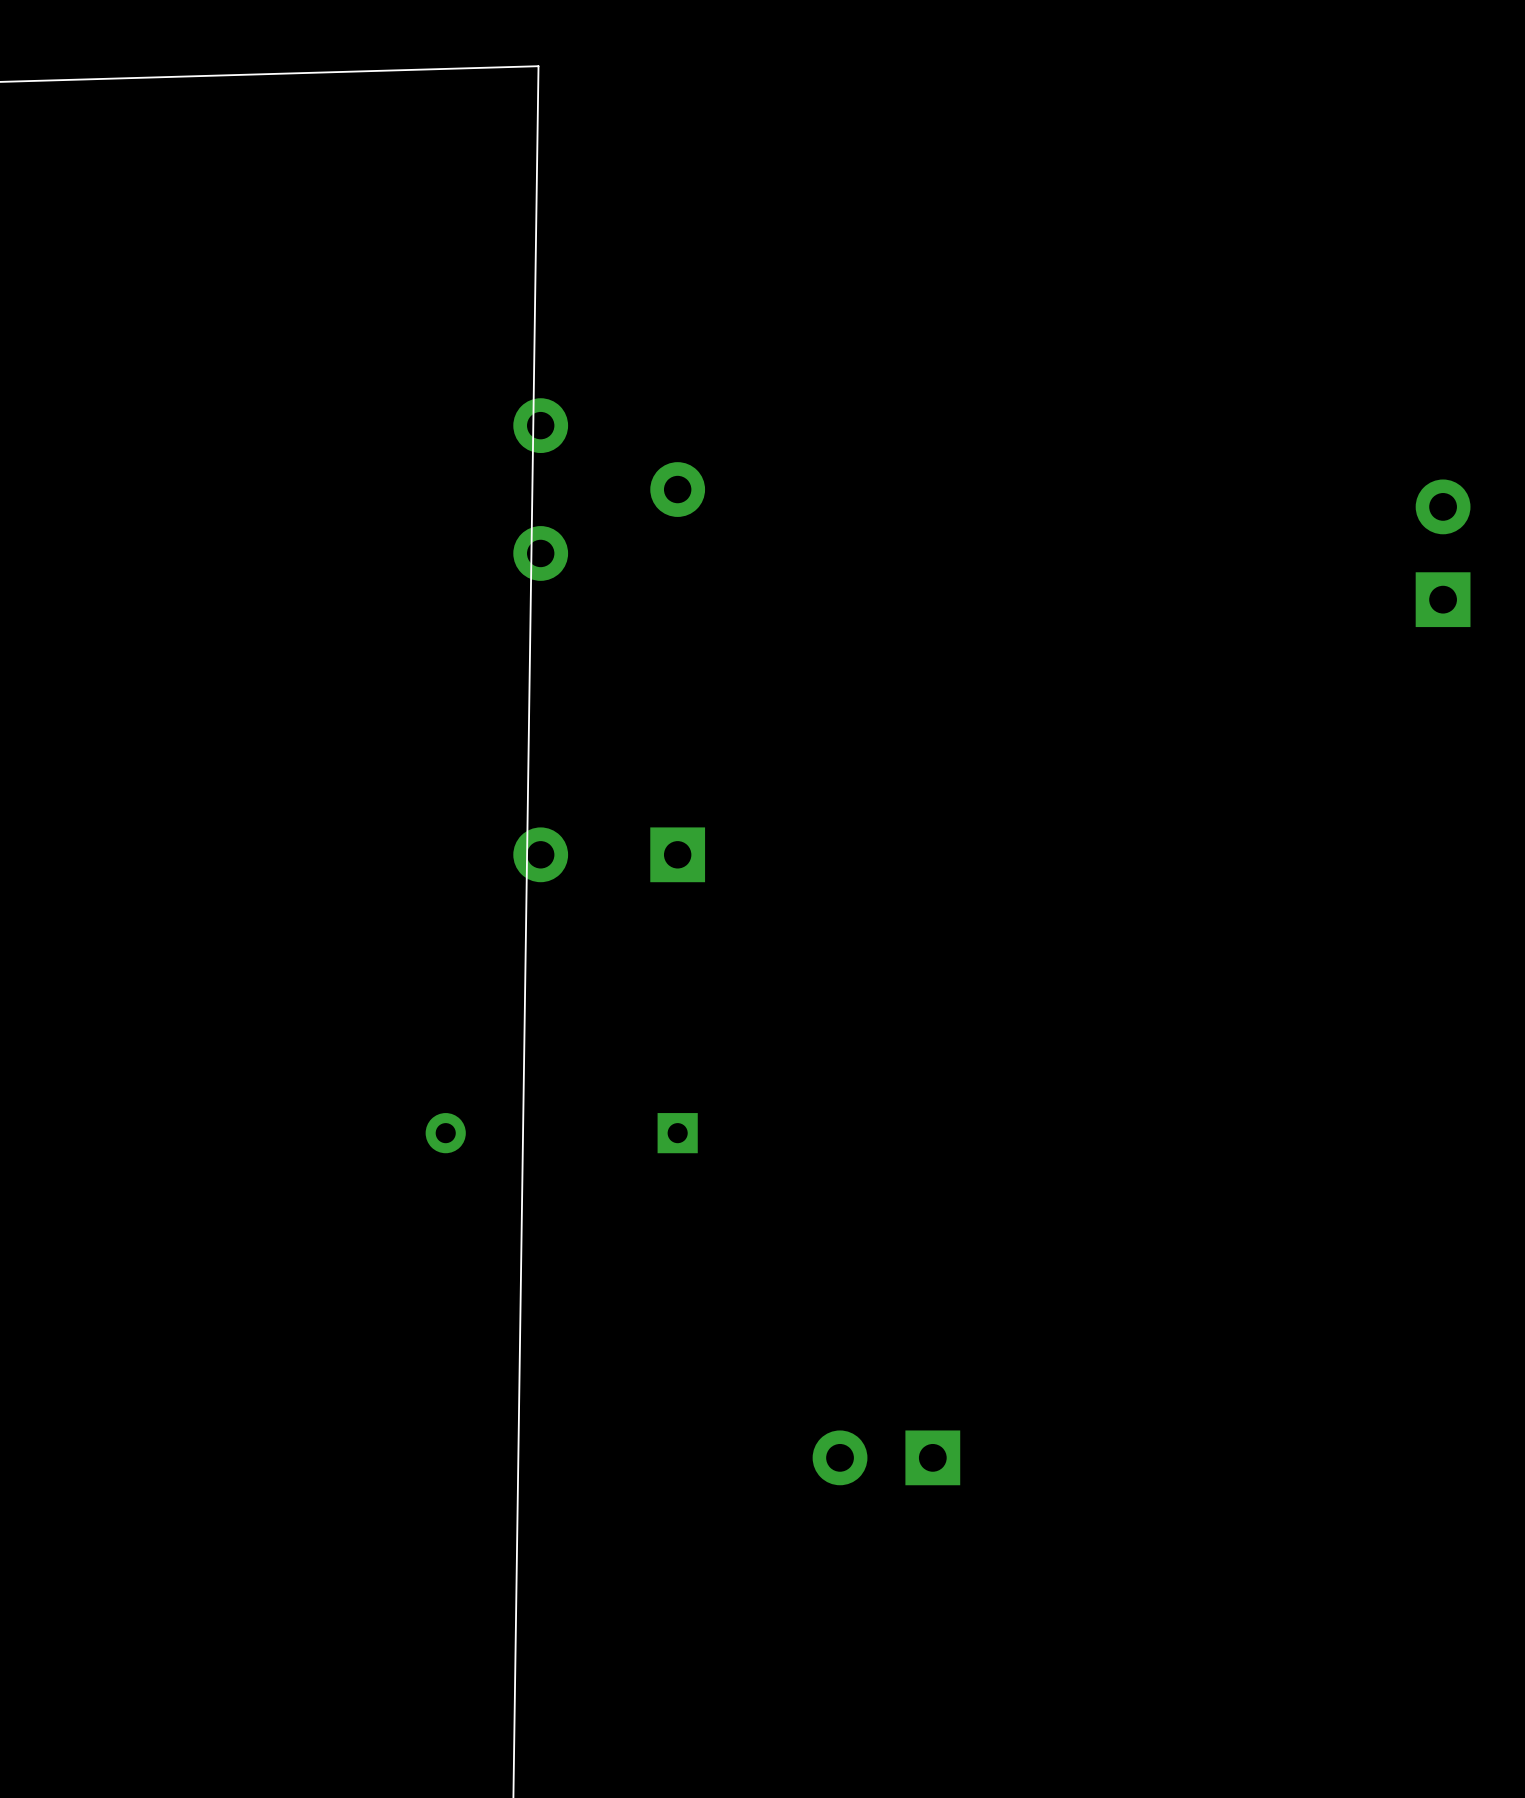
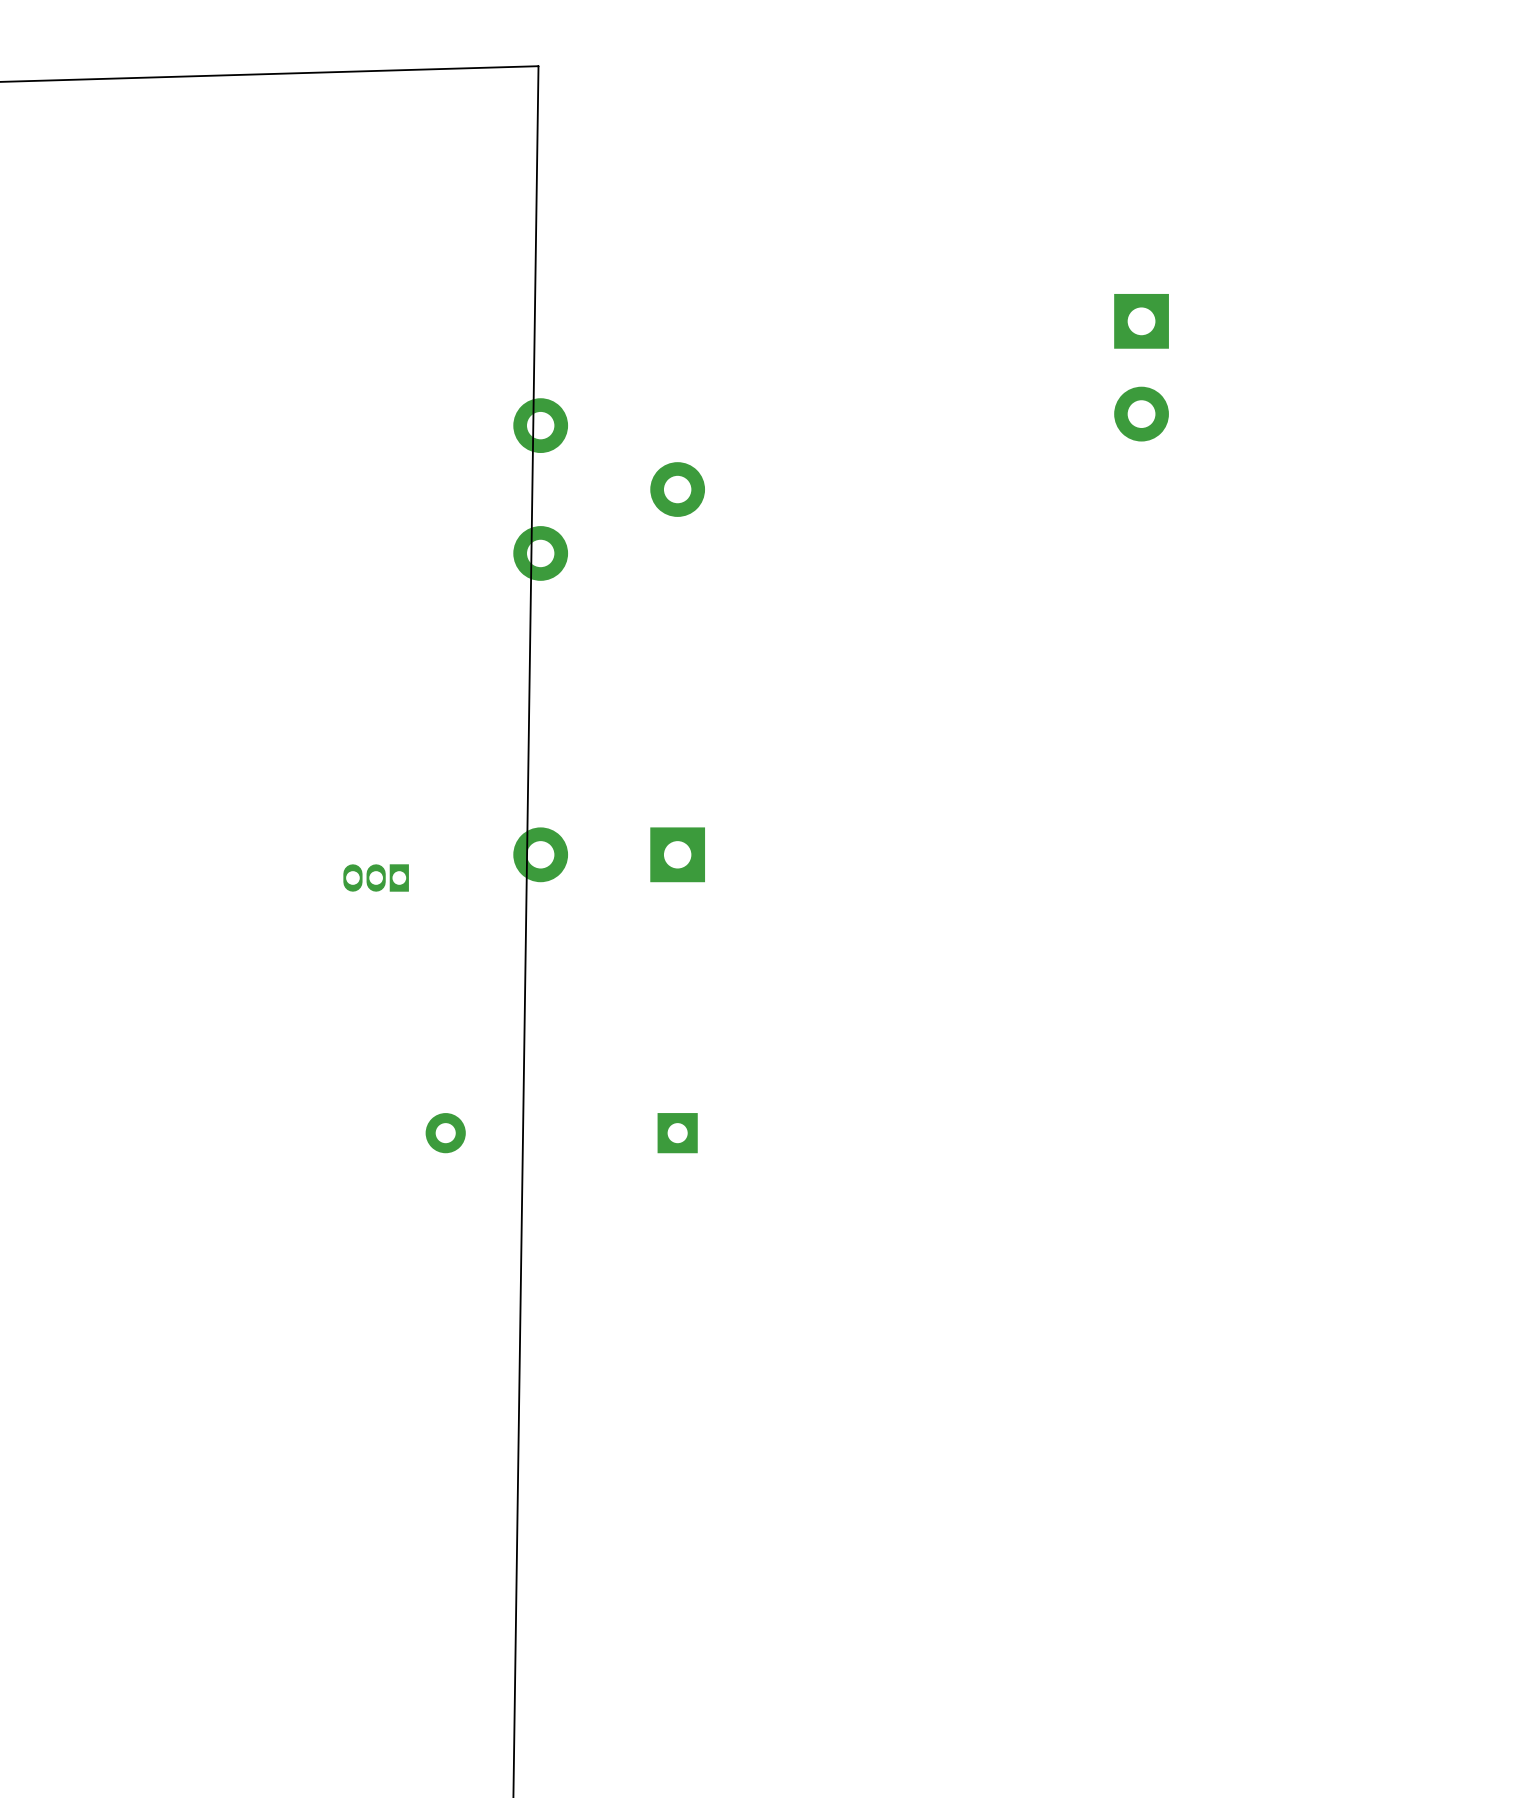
part rotation: 0° (1443, 553) -> 180° (1141, 367)
part position: (1443, 553) -> (1141, 367)
part: none -> (376, 878)
part: (886, 1457) -> none

